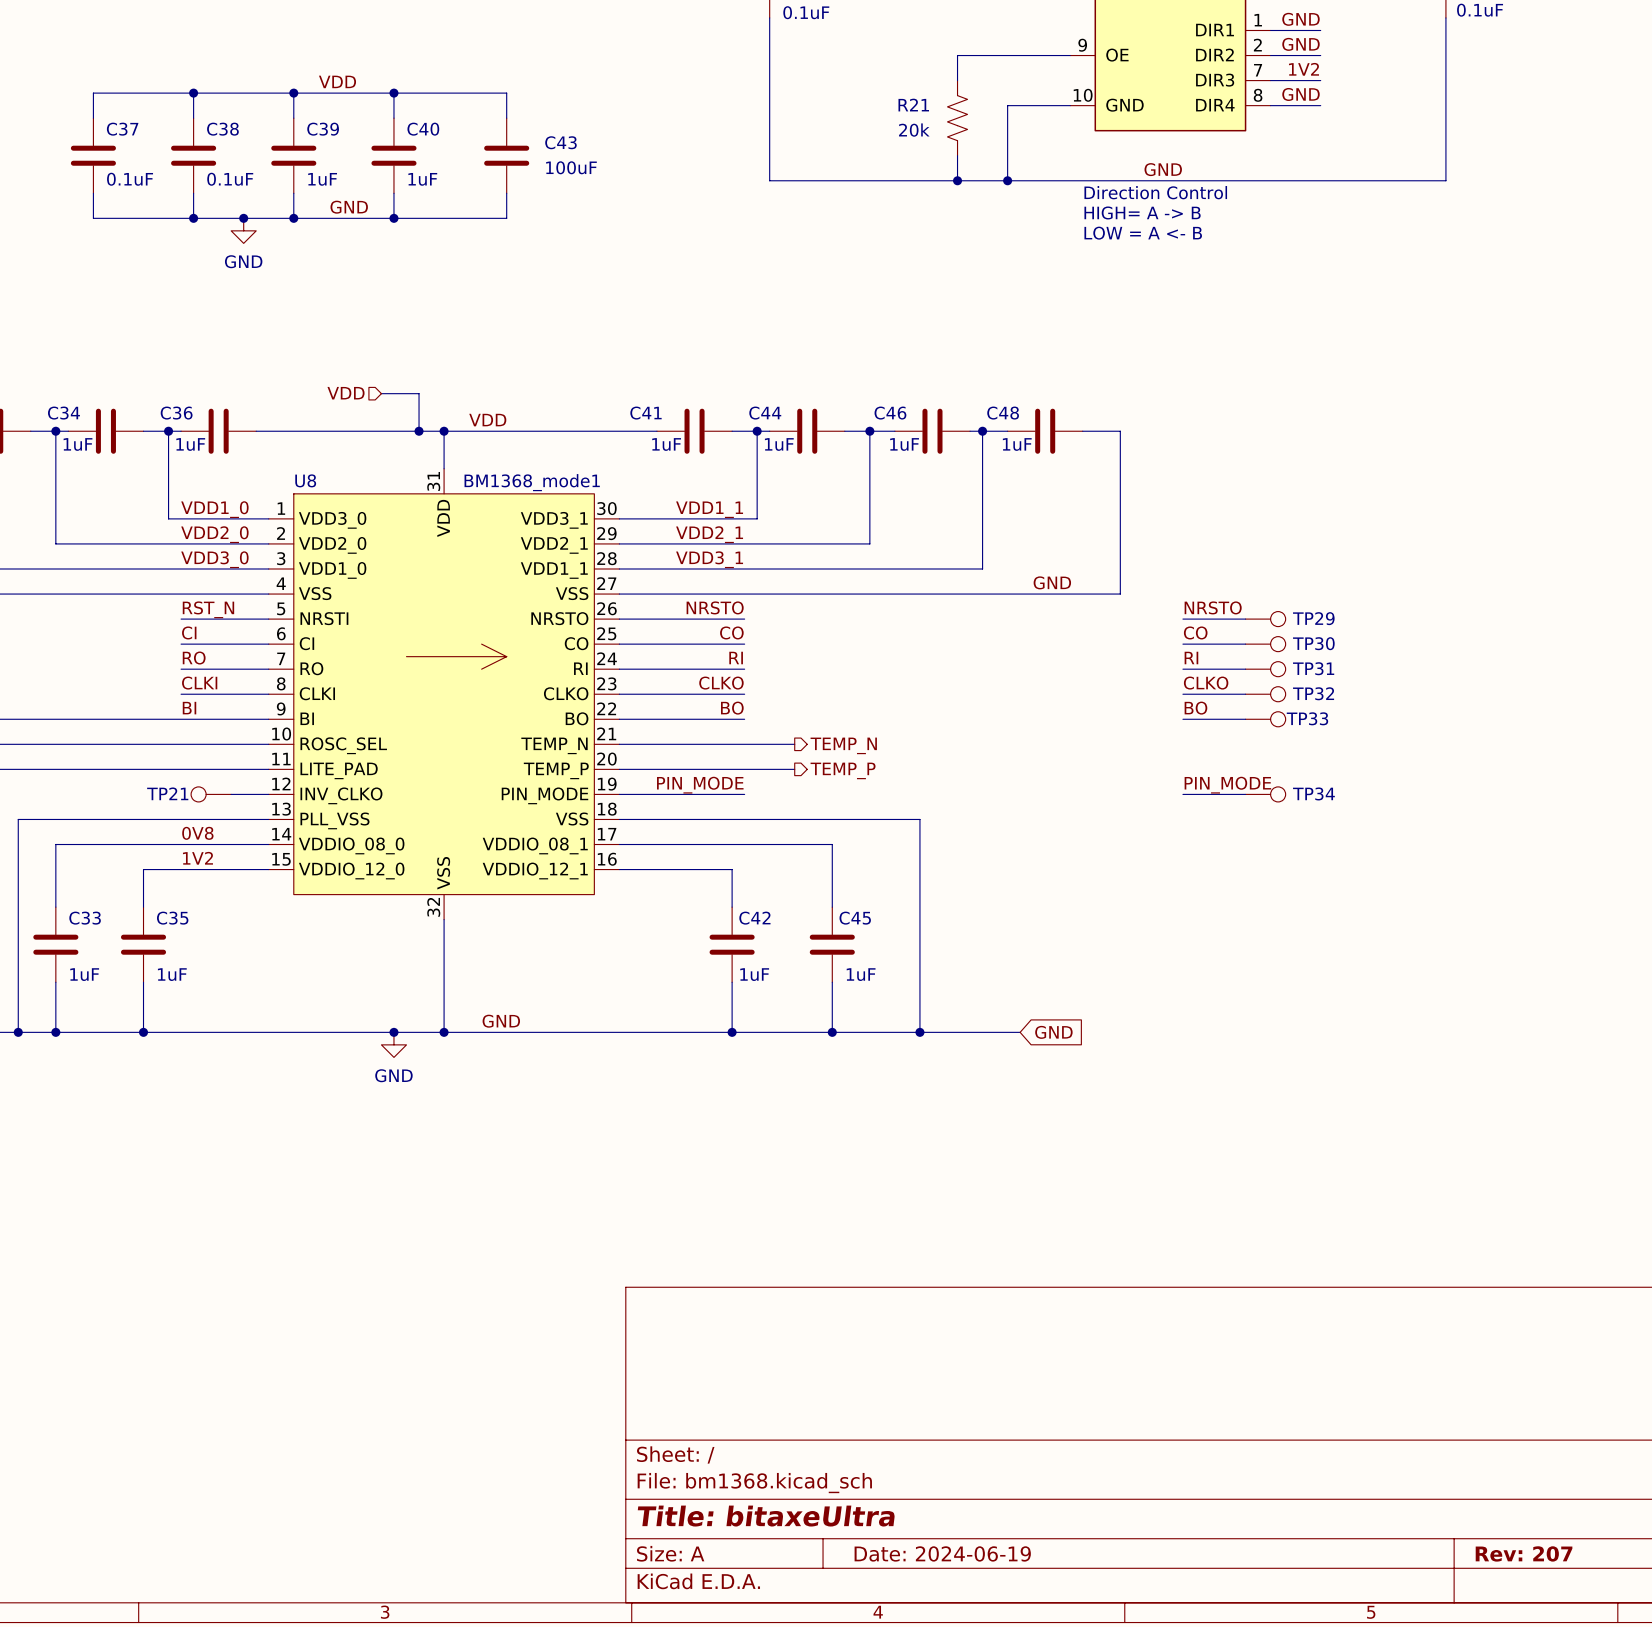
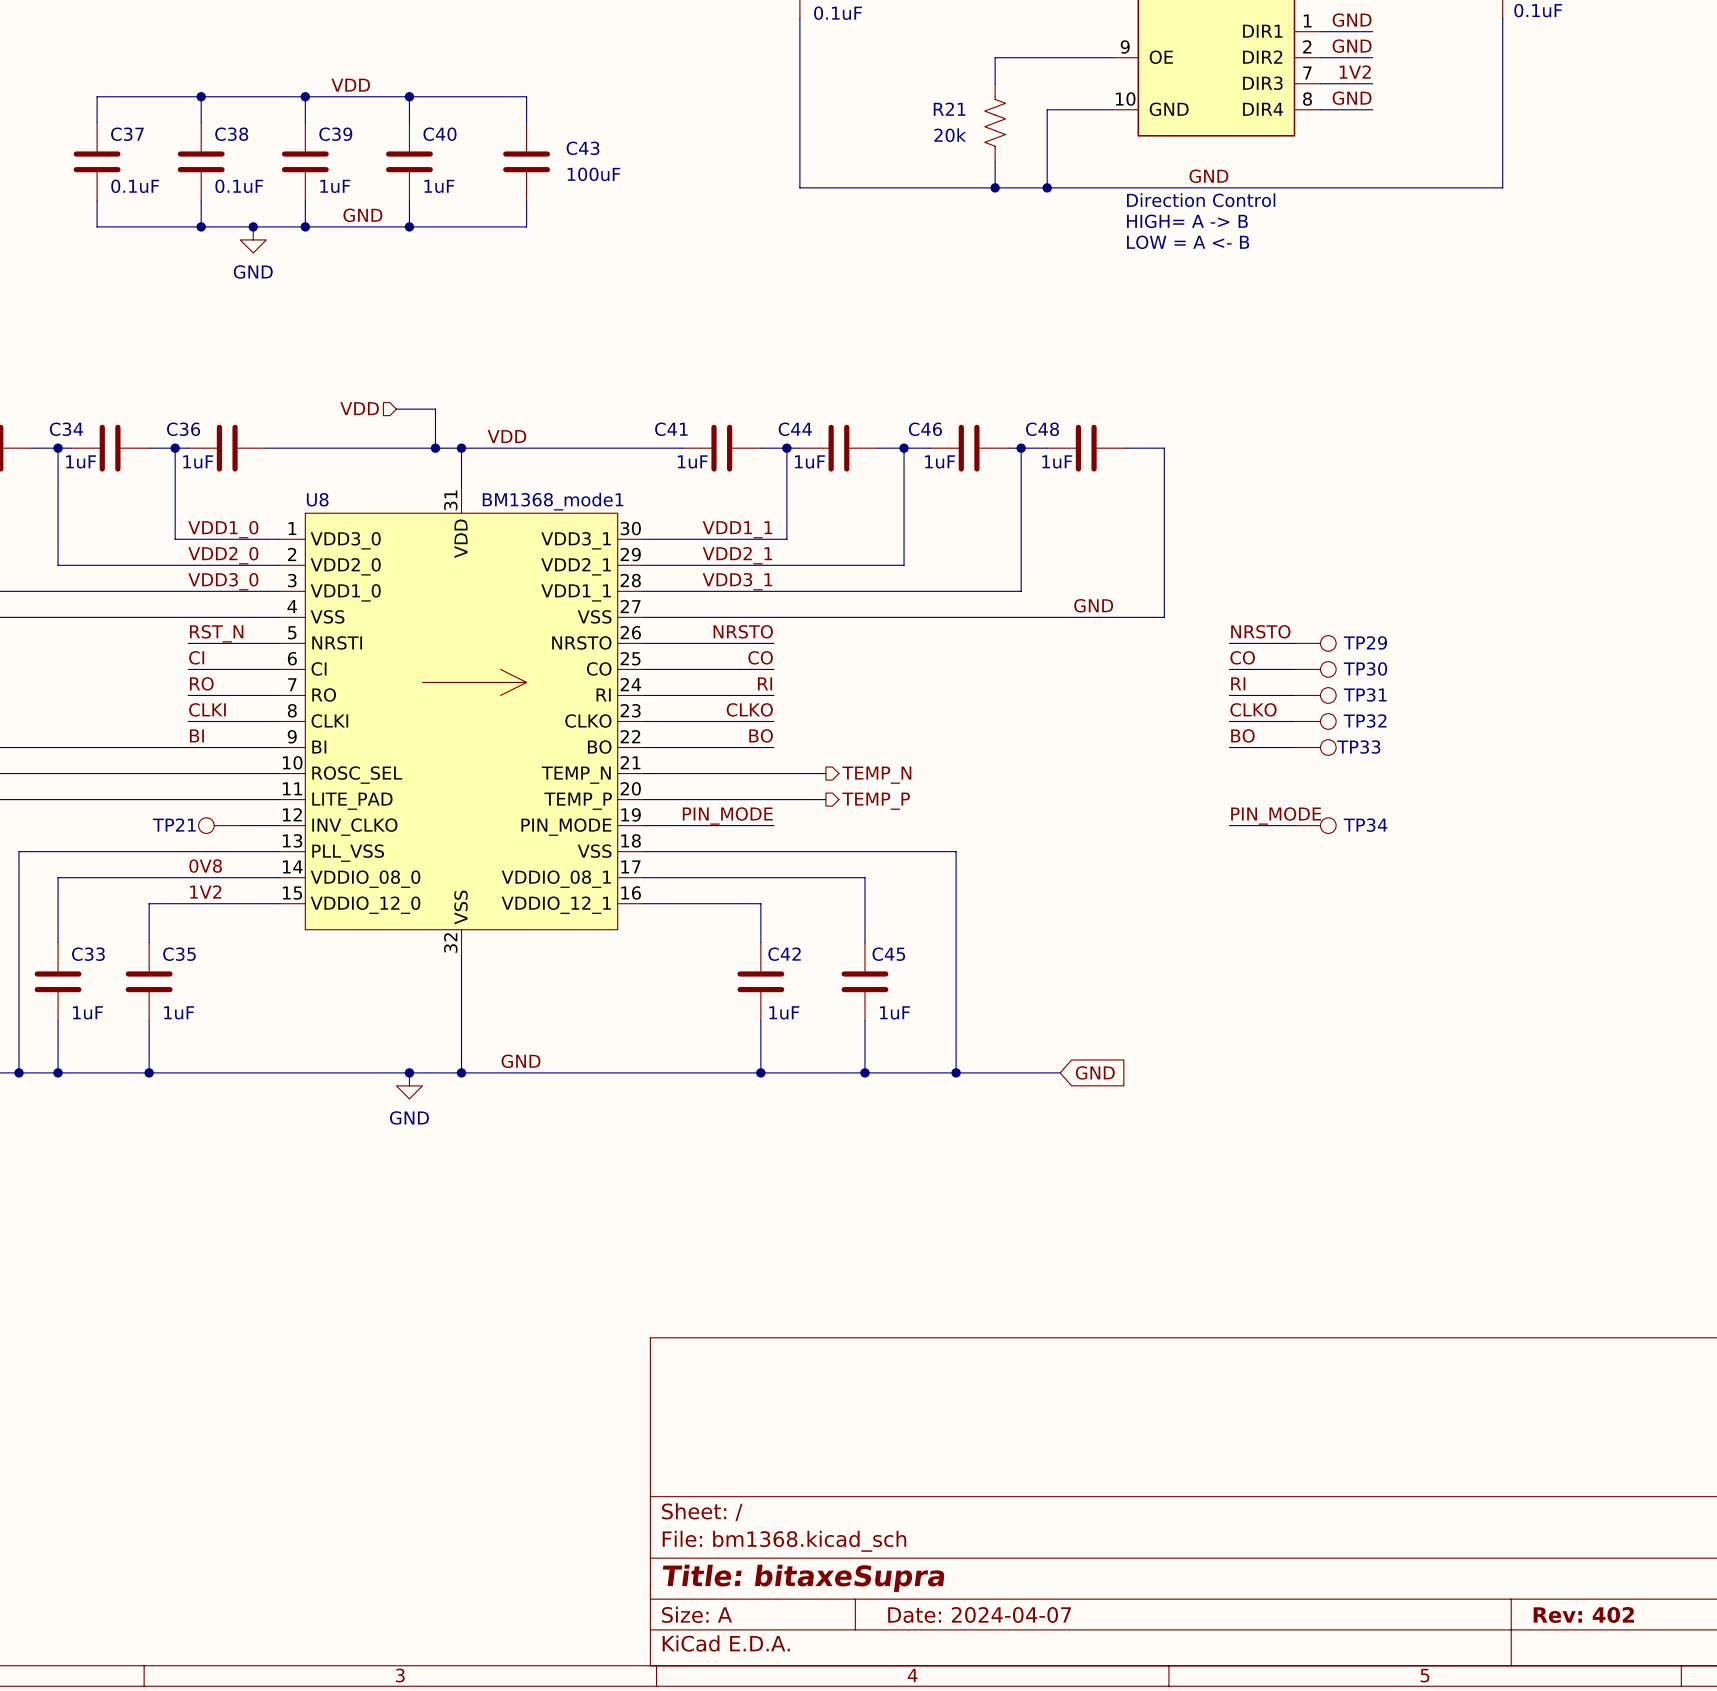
title block: Title: bitaxeUltra (766, 1516) -> Title: bitaxeSupra (803, 1578)
title block: Date: 2024-06-19 (942, 1553) -> Date: 2024-04-07 (979, 1614)
title block: Rev: 207 (1524, 1553) -> Rev: 402 (1583, 1614)

